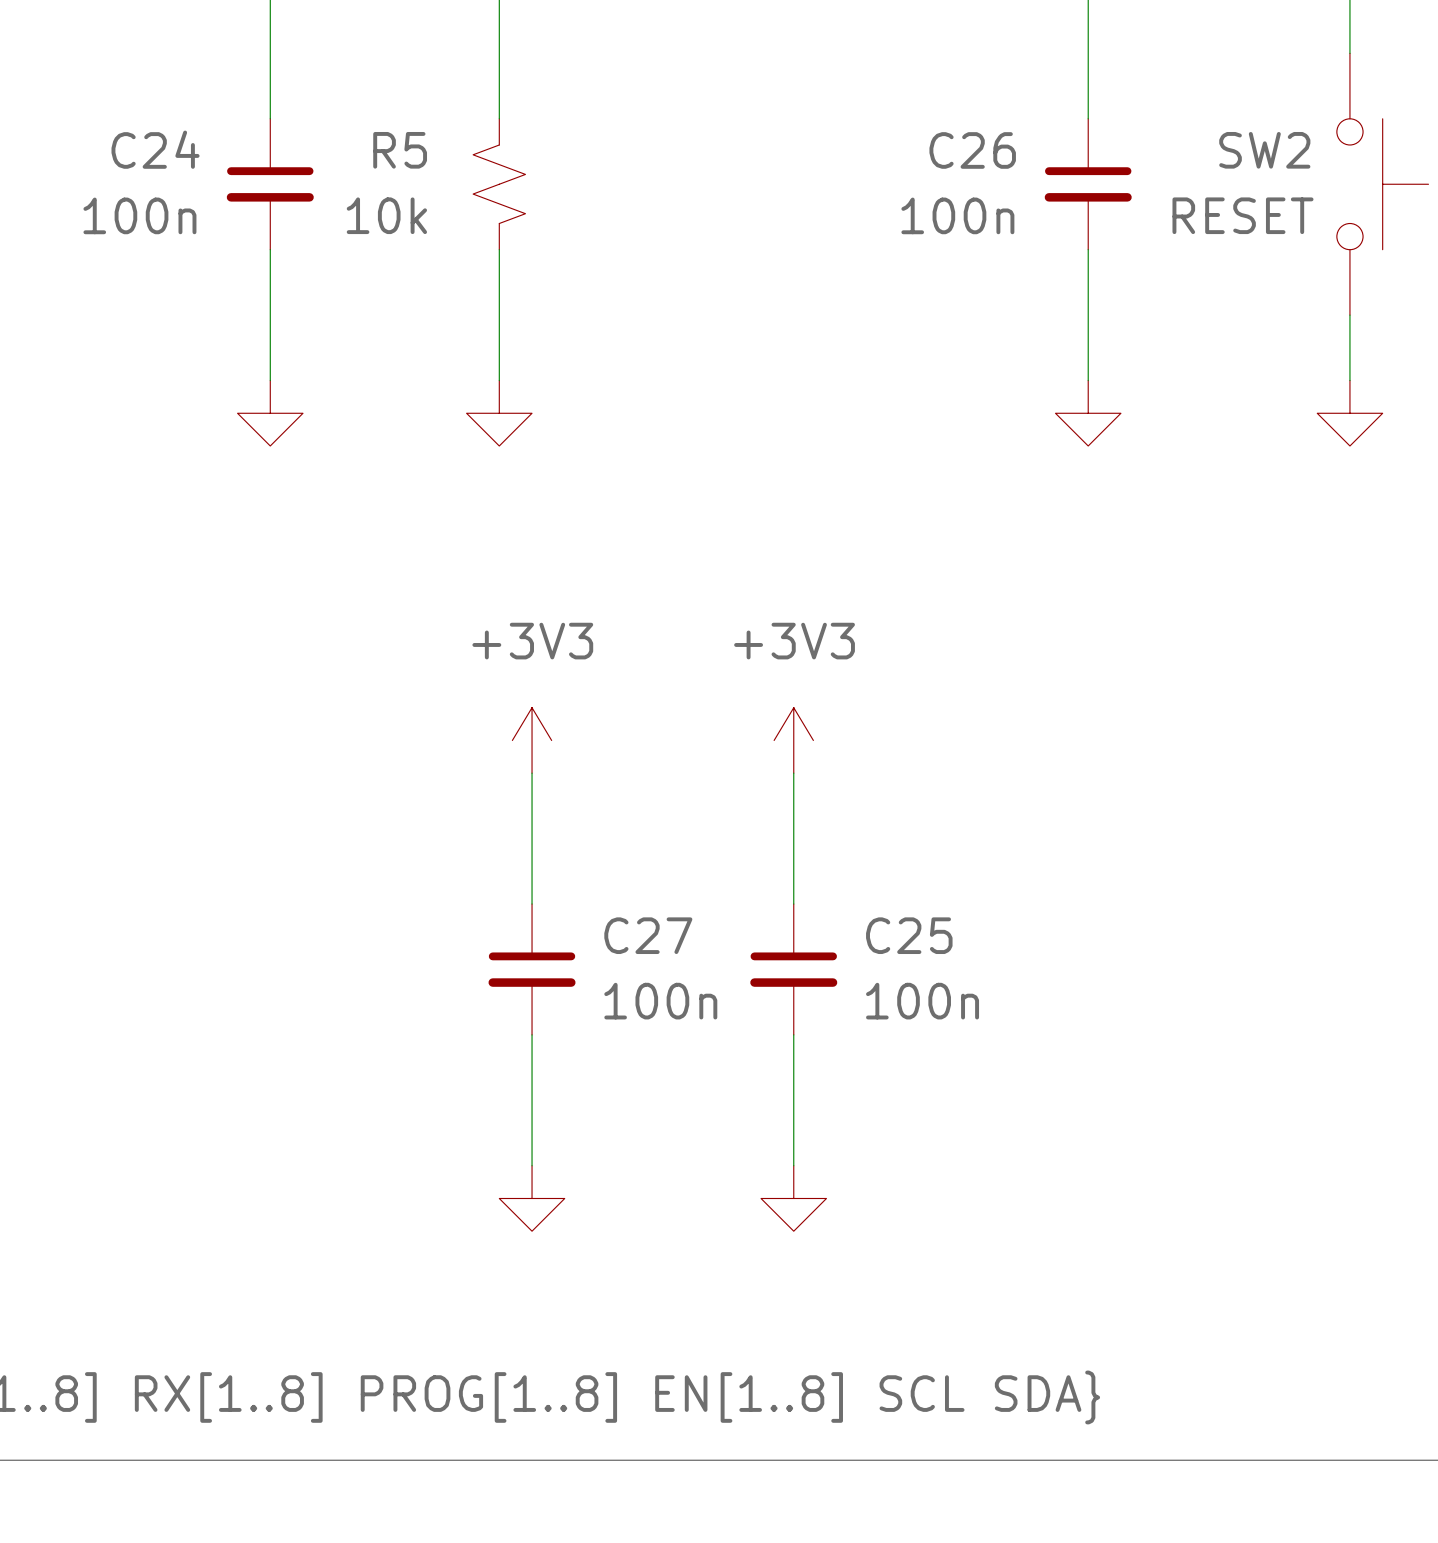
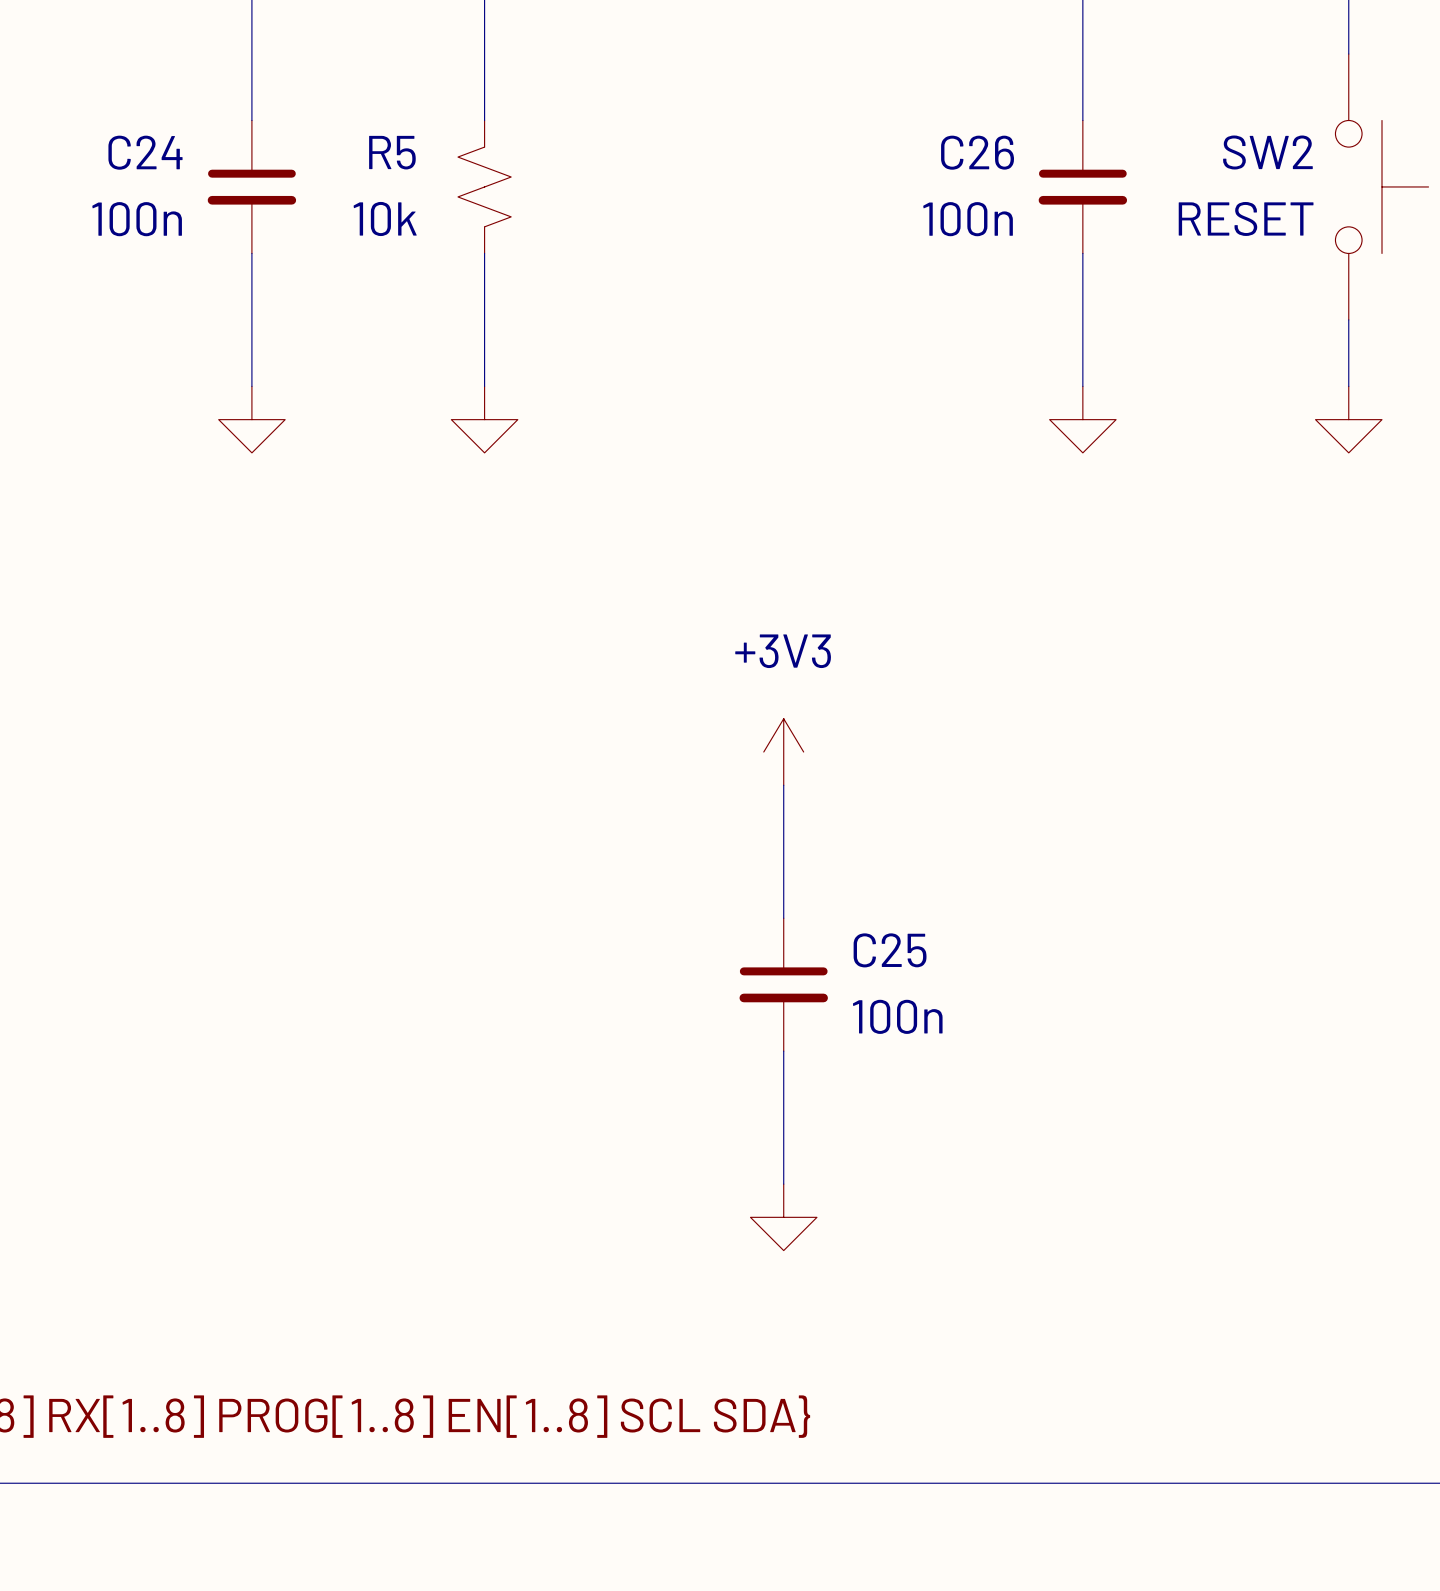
power symbol: +3V3 (532, 740) -> none
wire: (532, 773) (532, 904) -> none
C27: 100n (532, 969) -> none
wire: (532, 1034) (532, 1165) -> none
power symbol: (532, 1198) -> none

